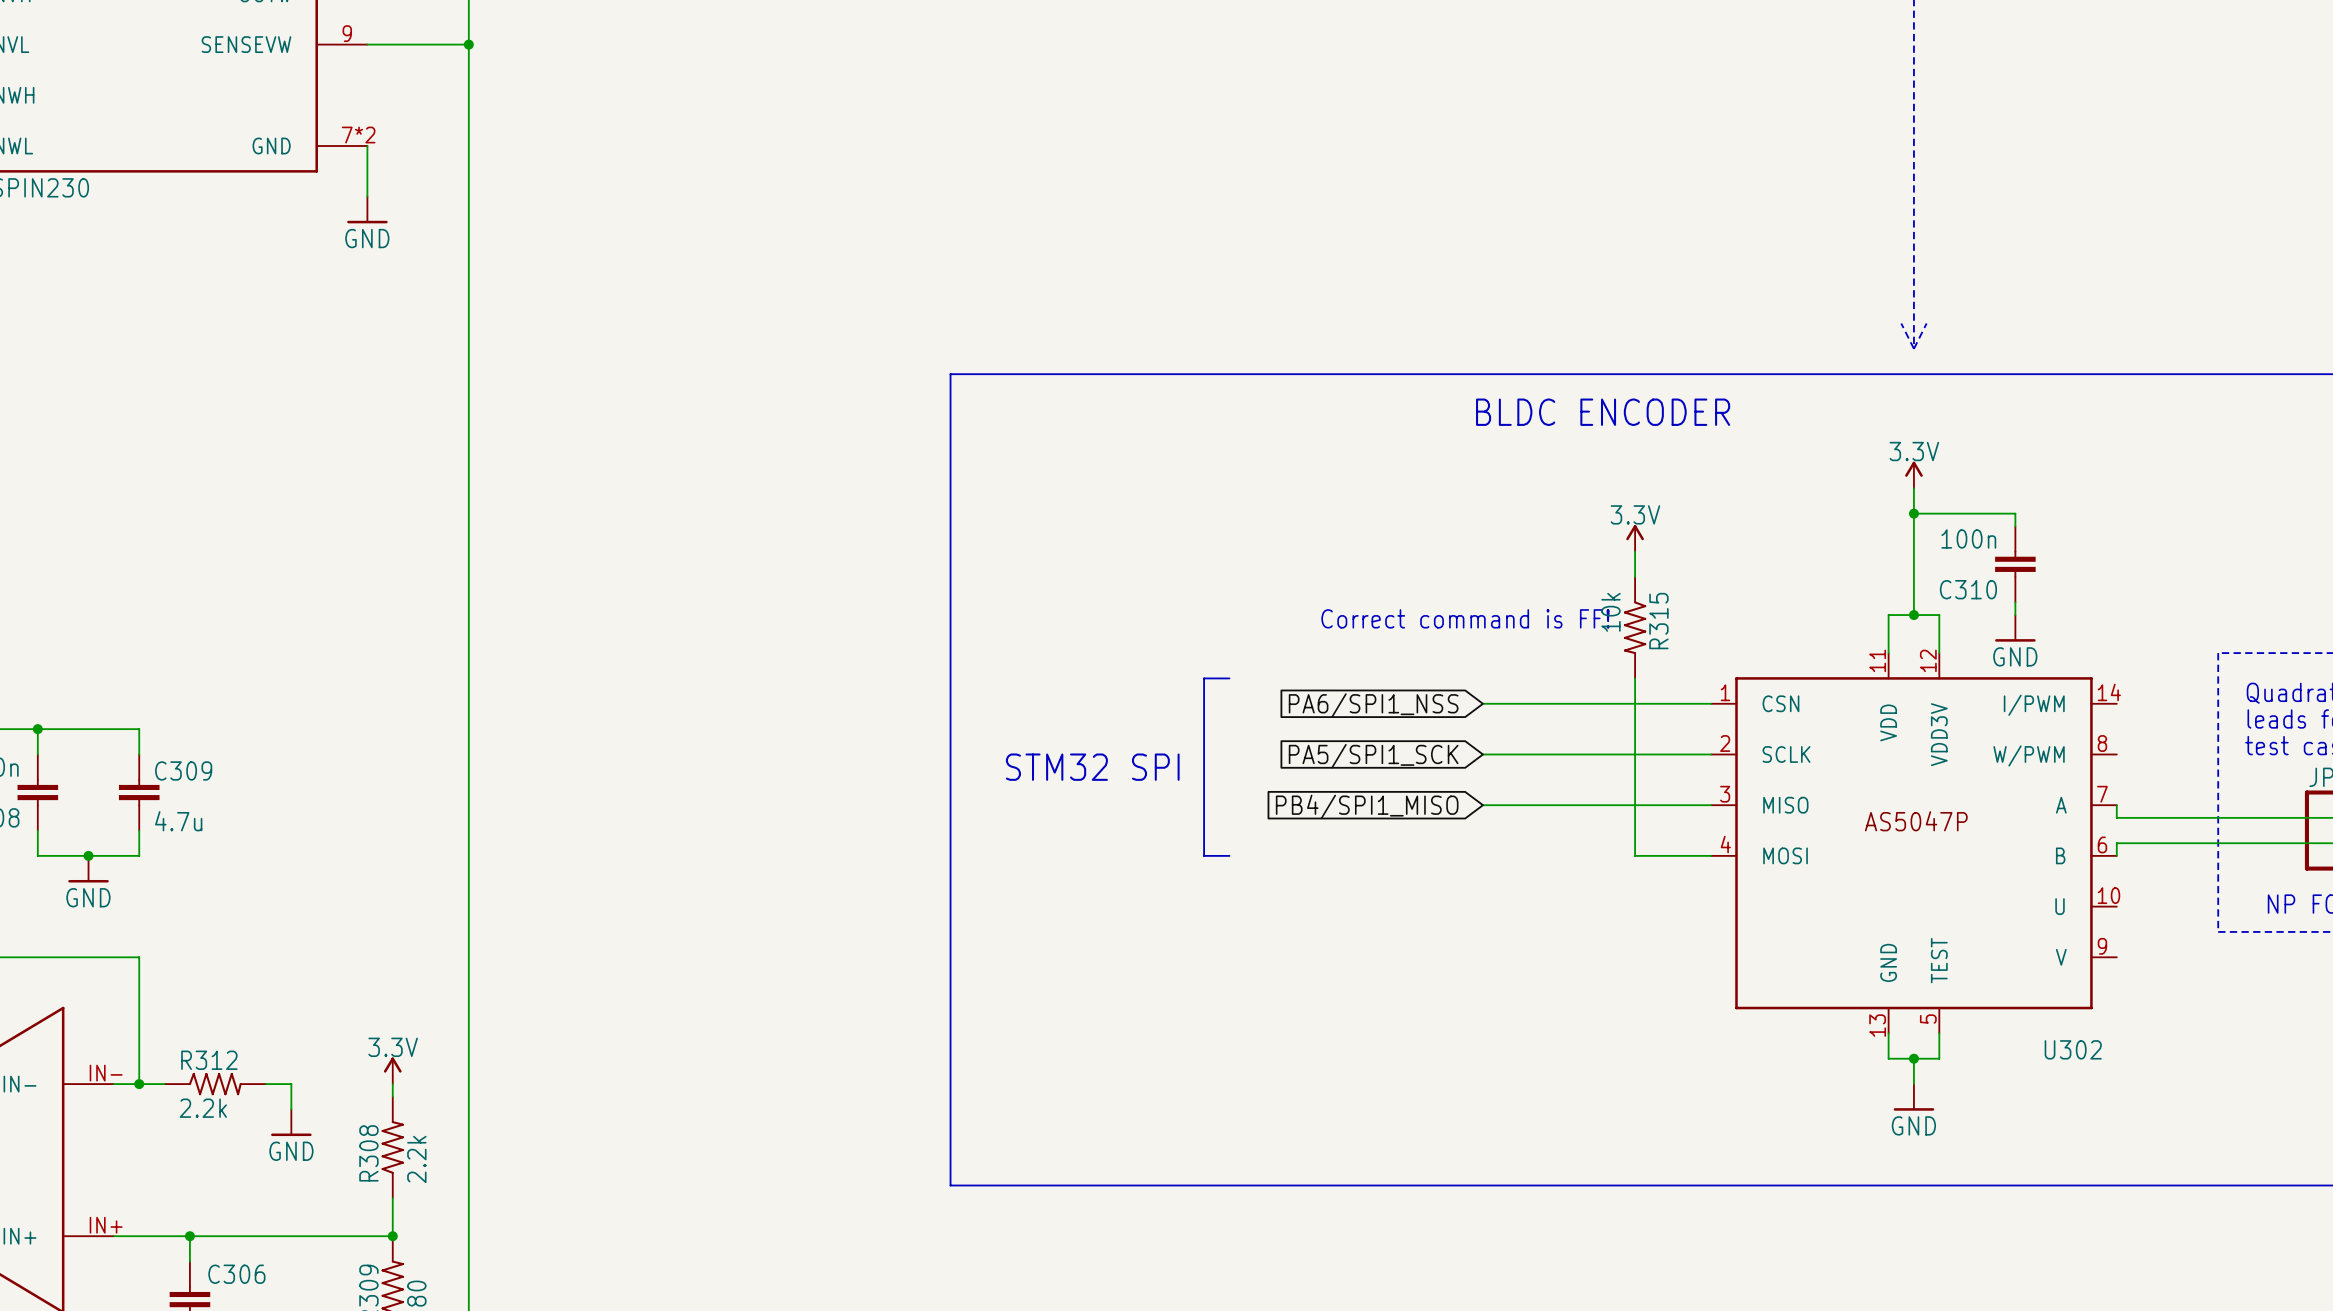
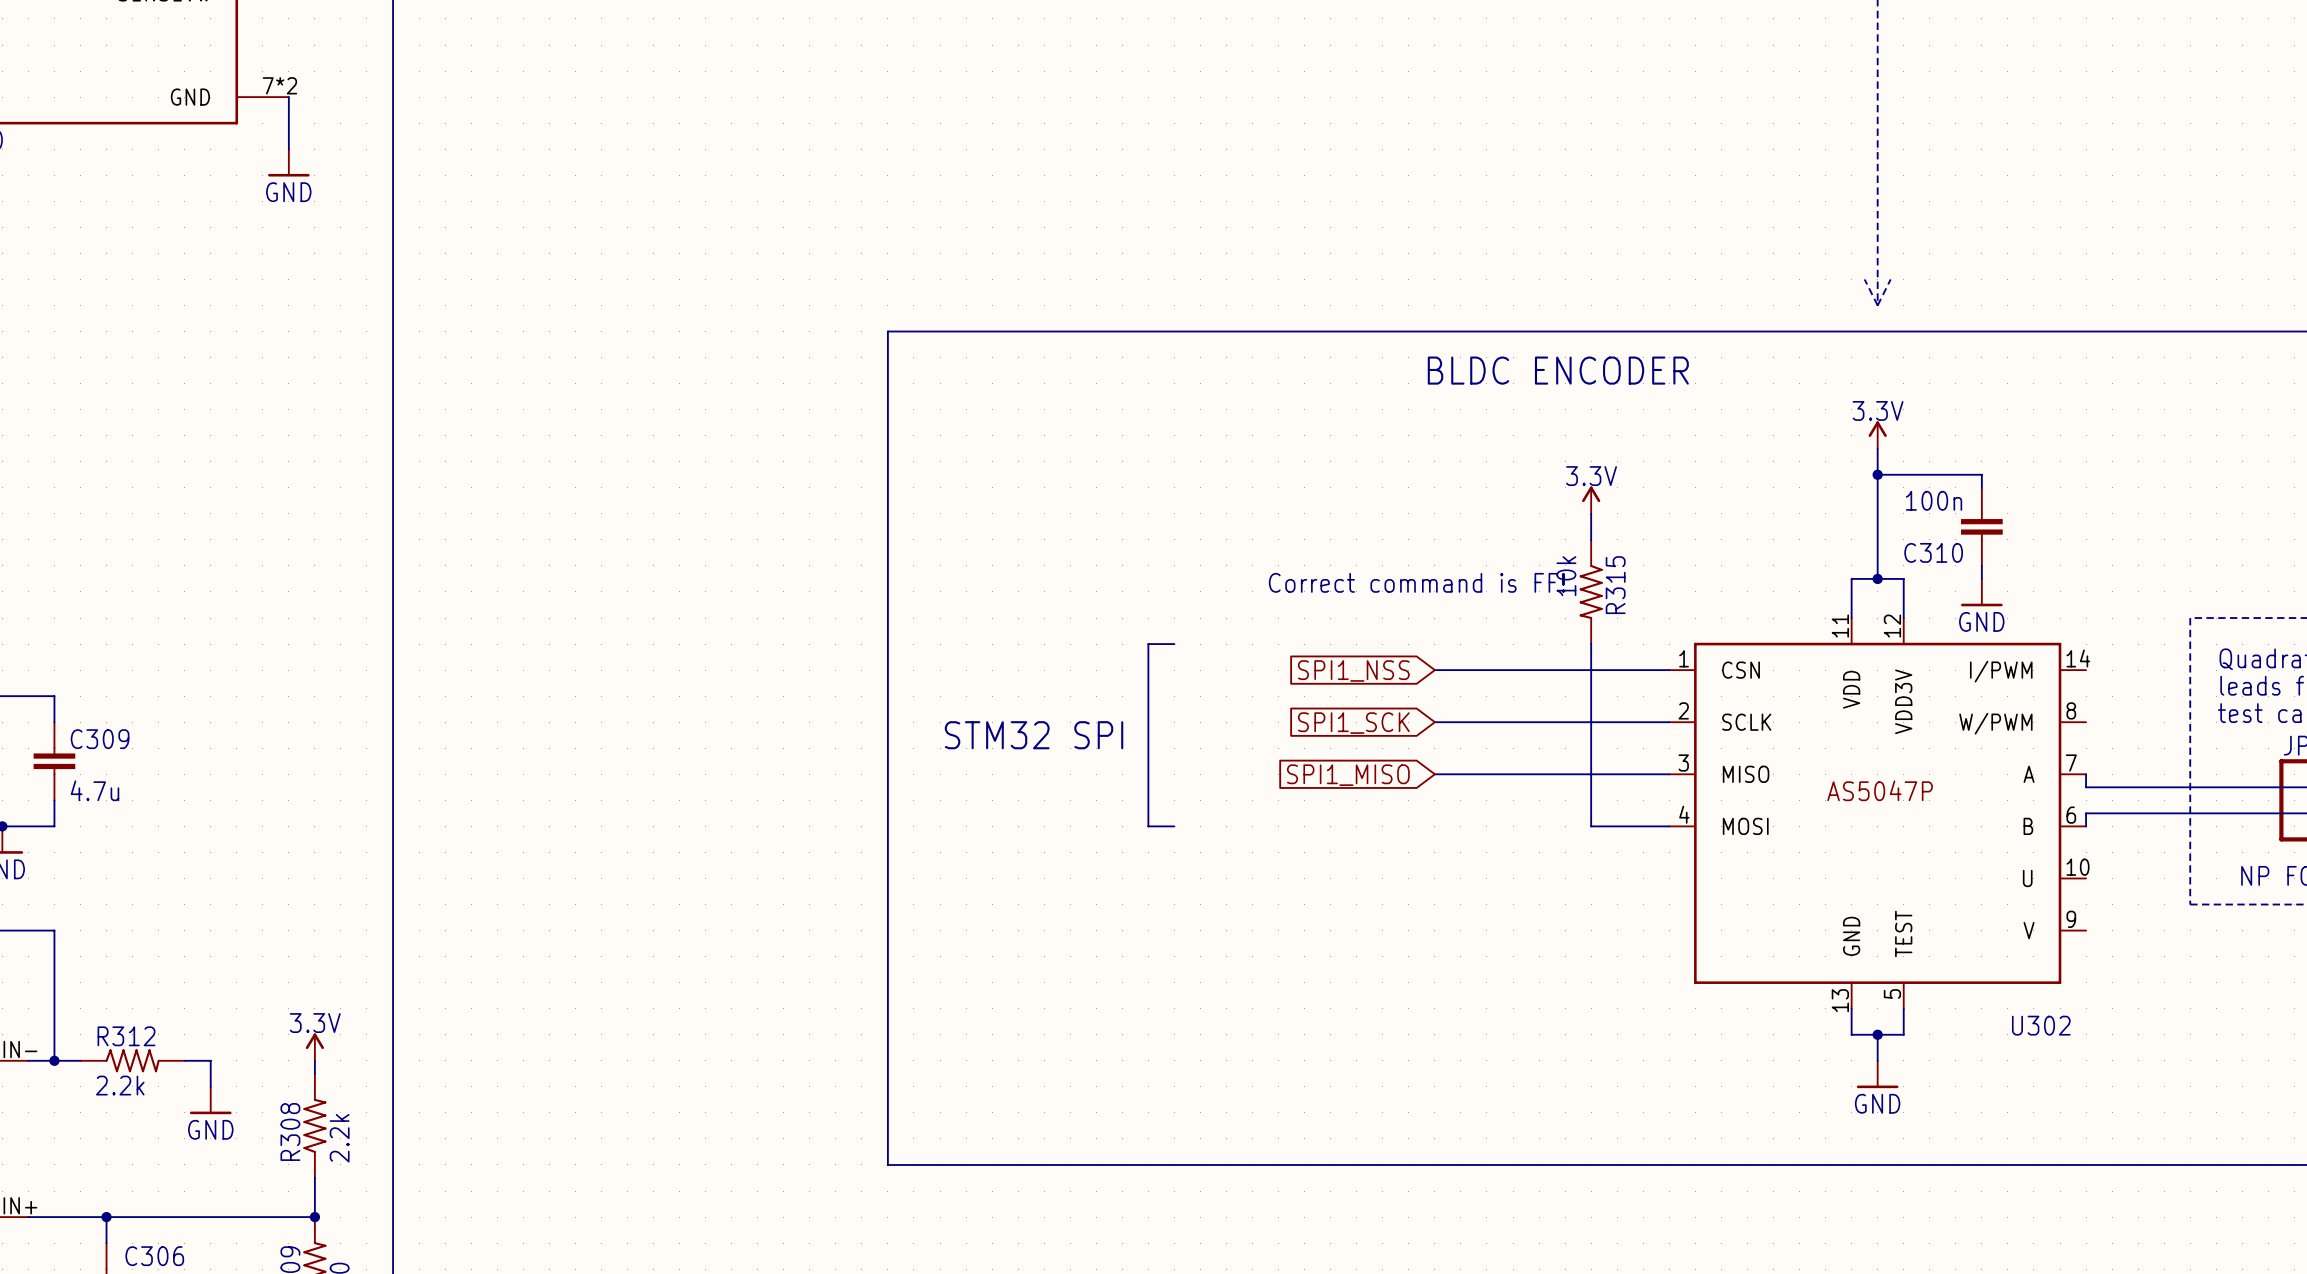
global label: PA6/SPI1_NSS (1373, 705) -> SPI1_NSS (1353, 670)
global label: PA5/SPI1_SCK (1373, 756) -> SPI1_SCK (1353, 723)
global label: PB4/SPI1_MISO (1367, 806) -> SPI1_MISO (1348, 775)

